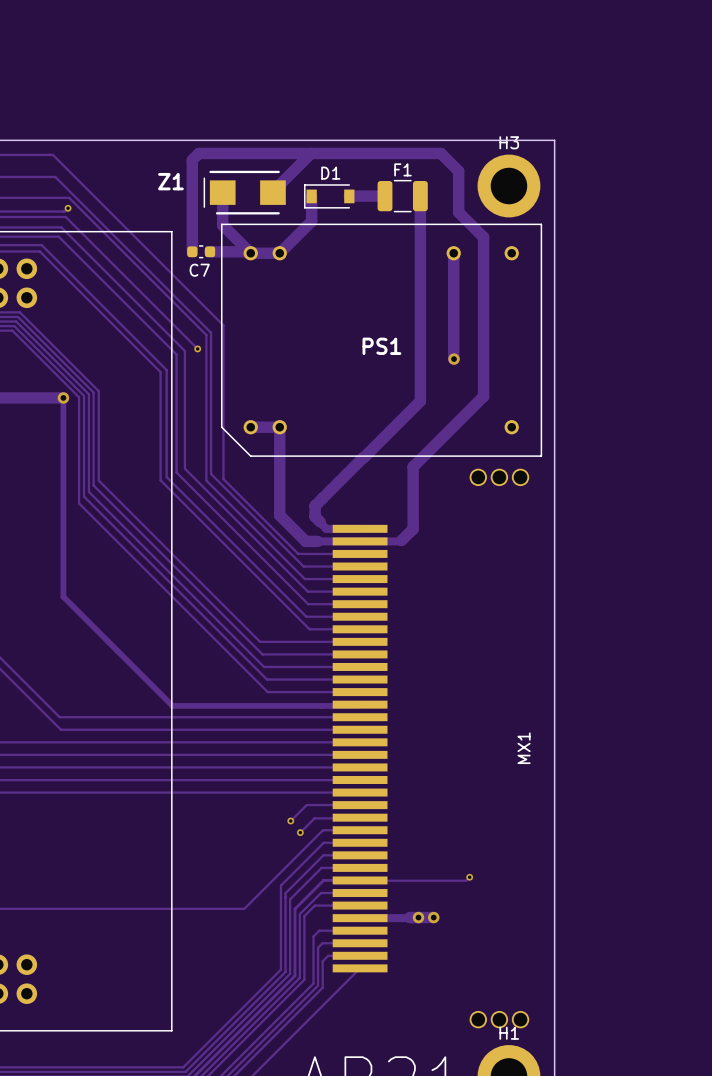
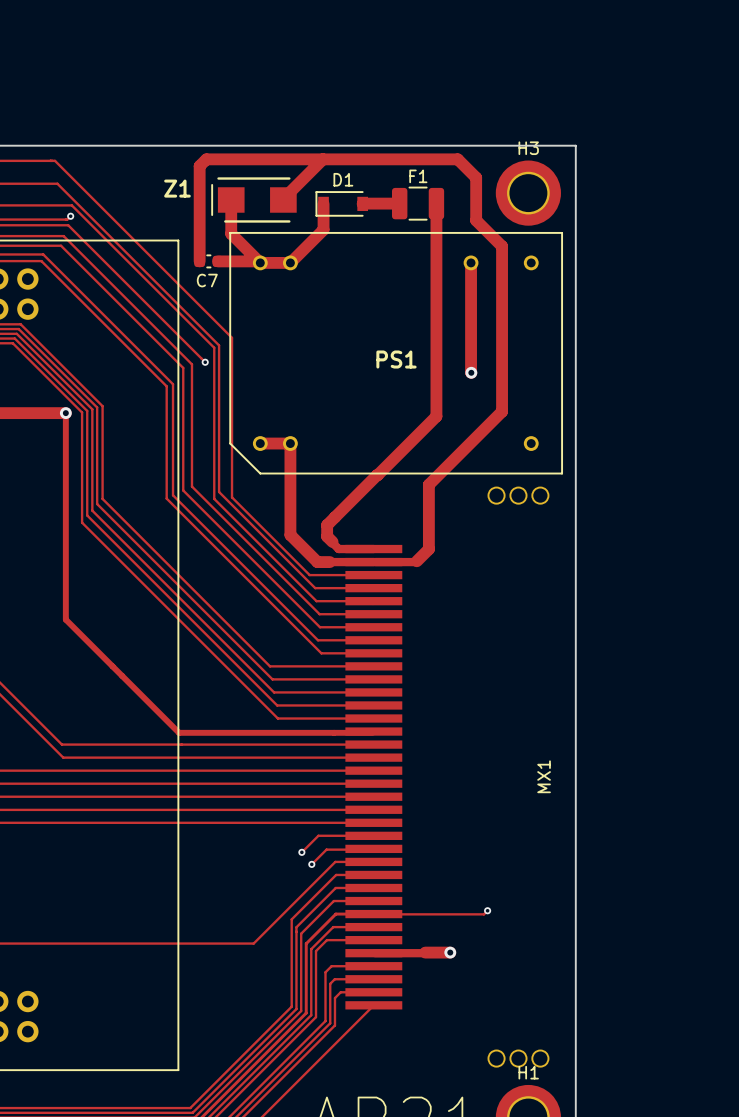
via: (418, 917) -> none

